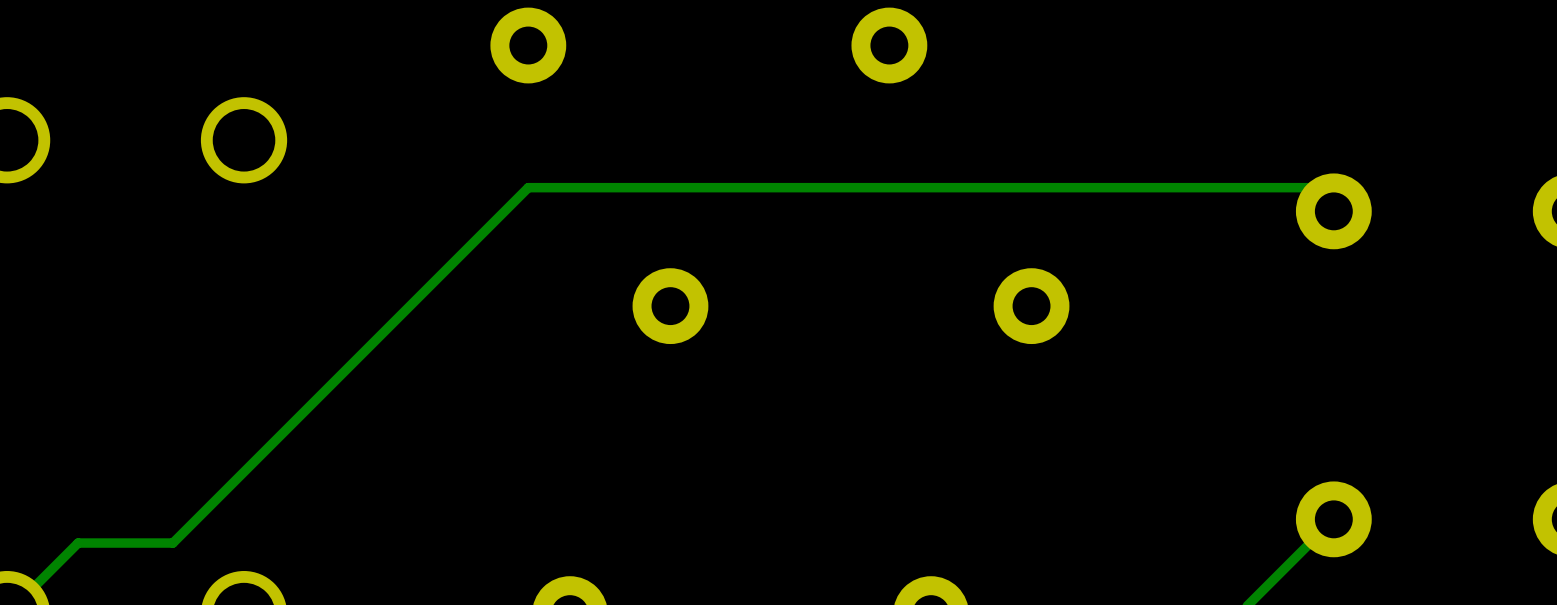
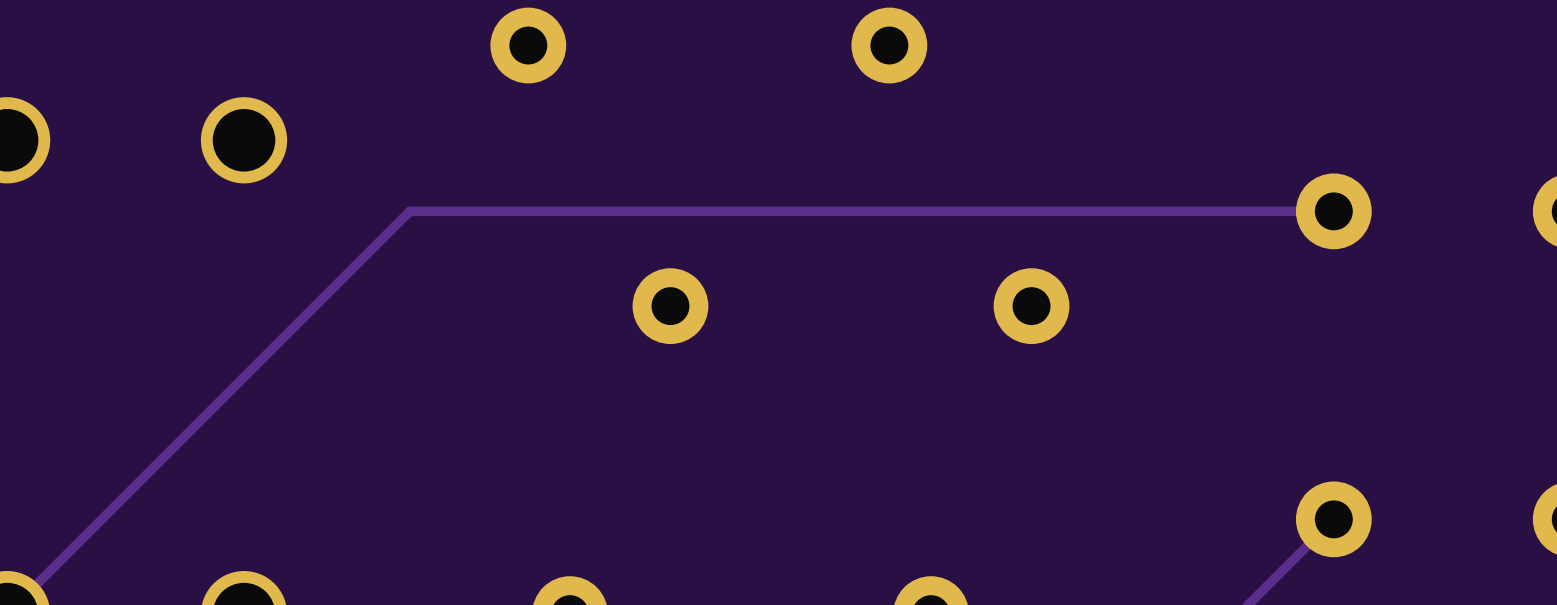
track: (1333, 211) (1310, 187) (528, 187) (172, 543) (78, 543) -> (1333, 211) (409, 211) (78, 543)

